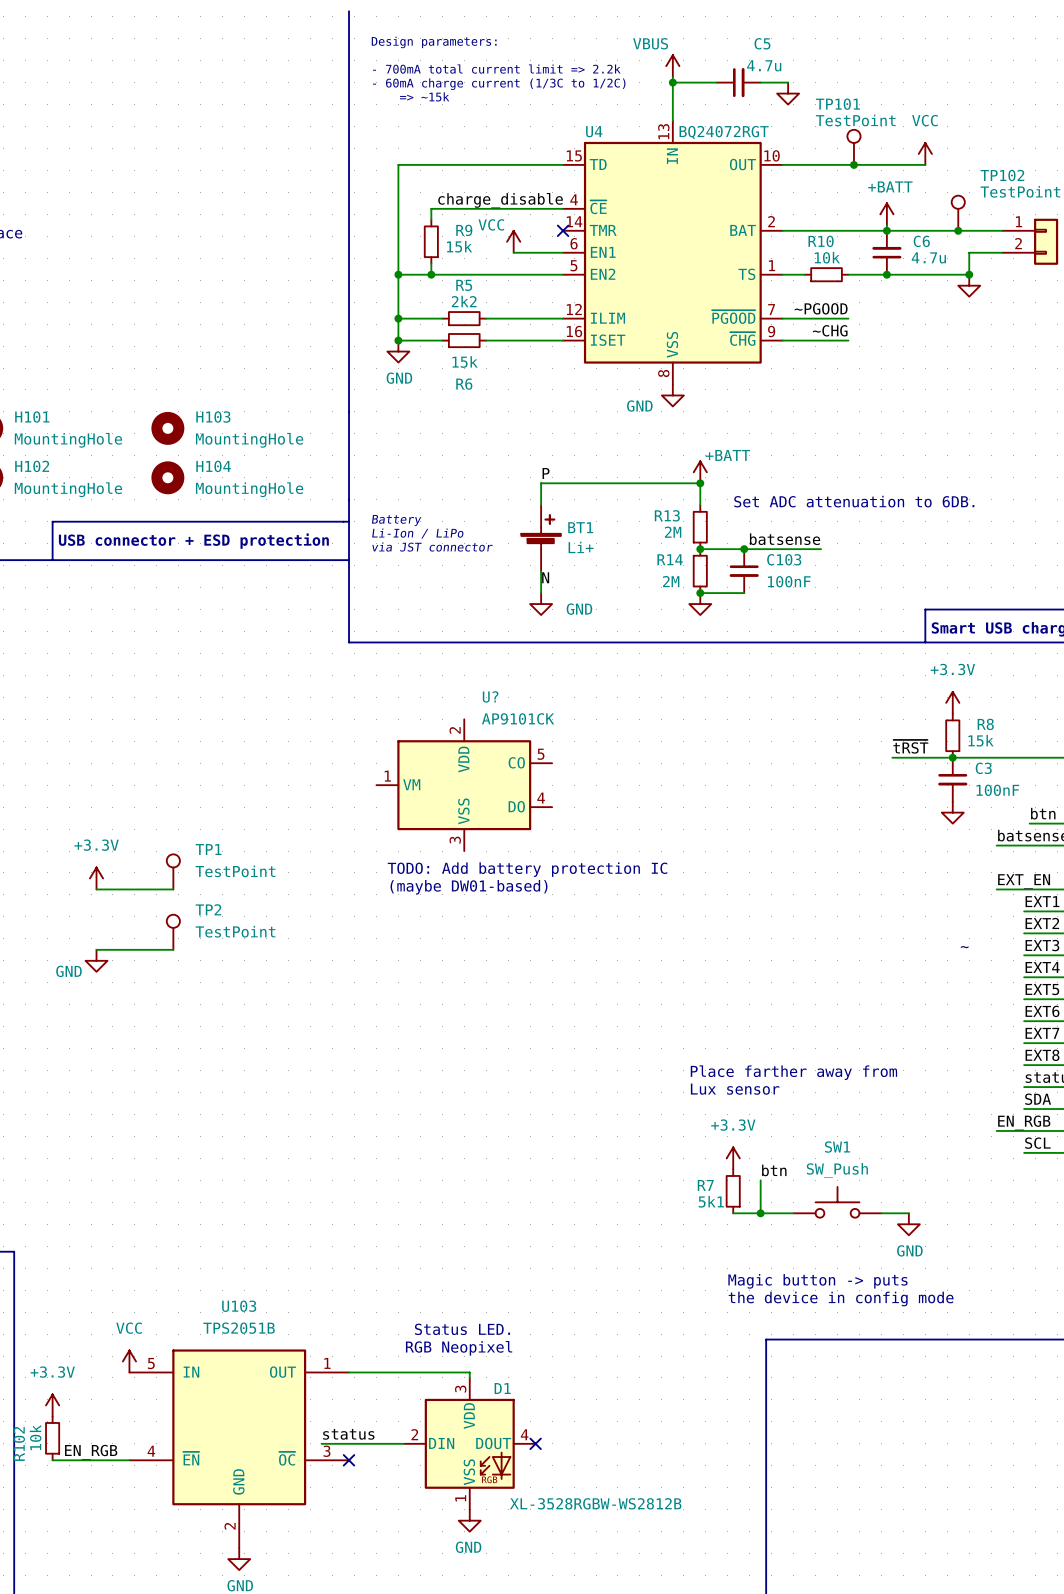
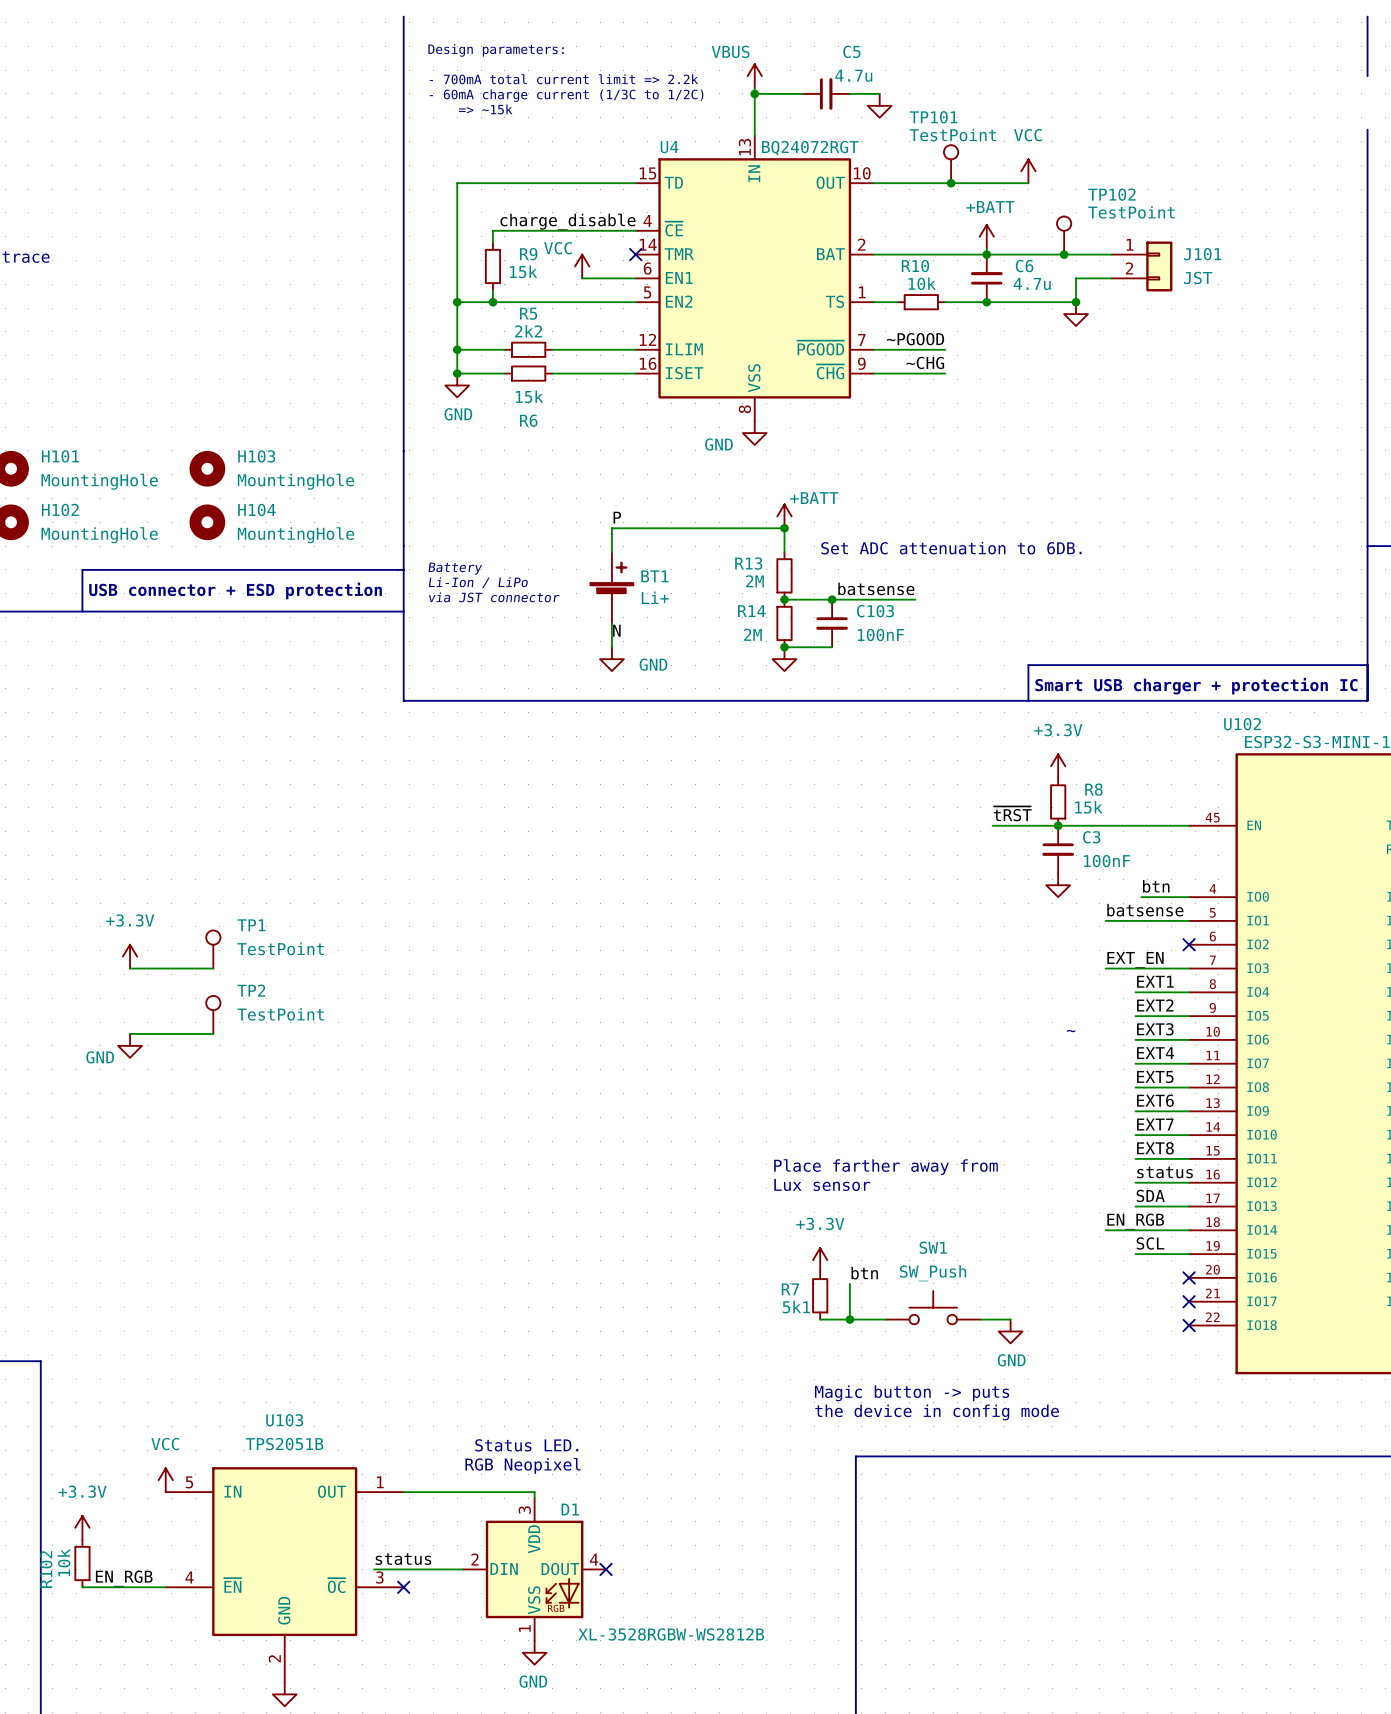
U?: AP9101CK (464, 785) -> none
text: TODO: Add battery protection IC (527, 869) -> none
text: (maybe DW01-based) (469, 887) -> none

